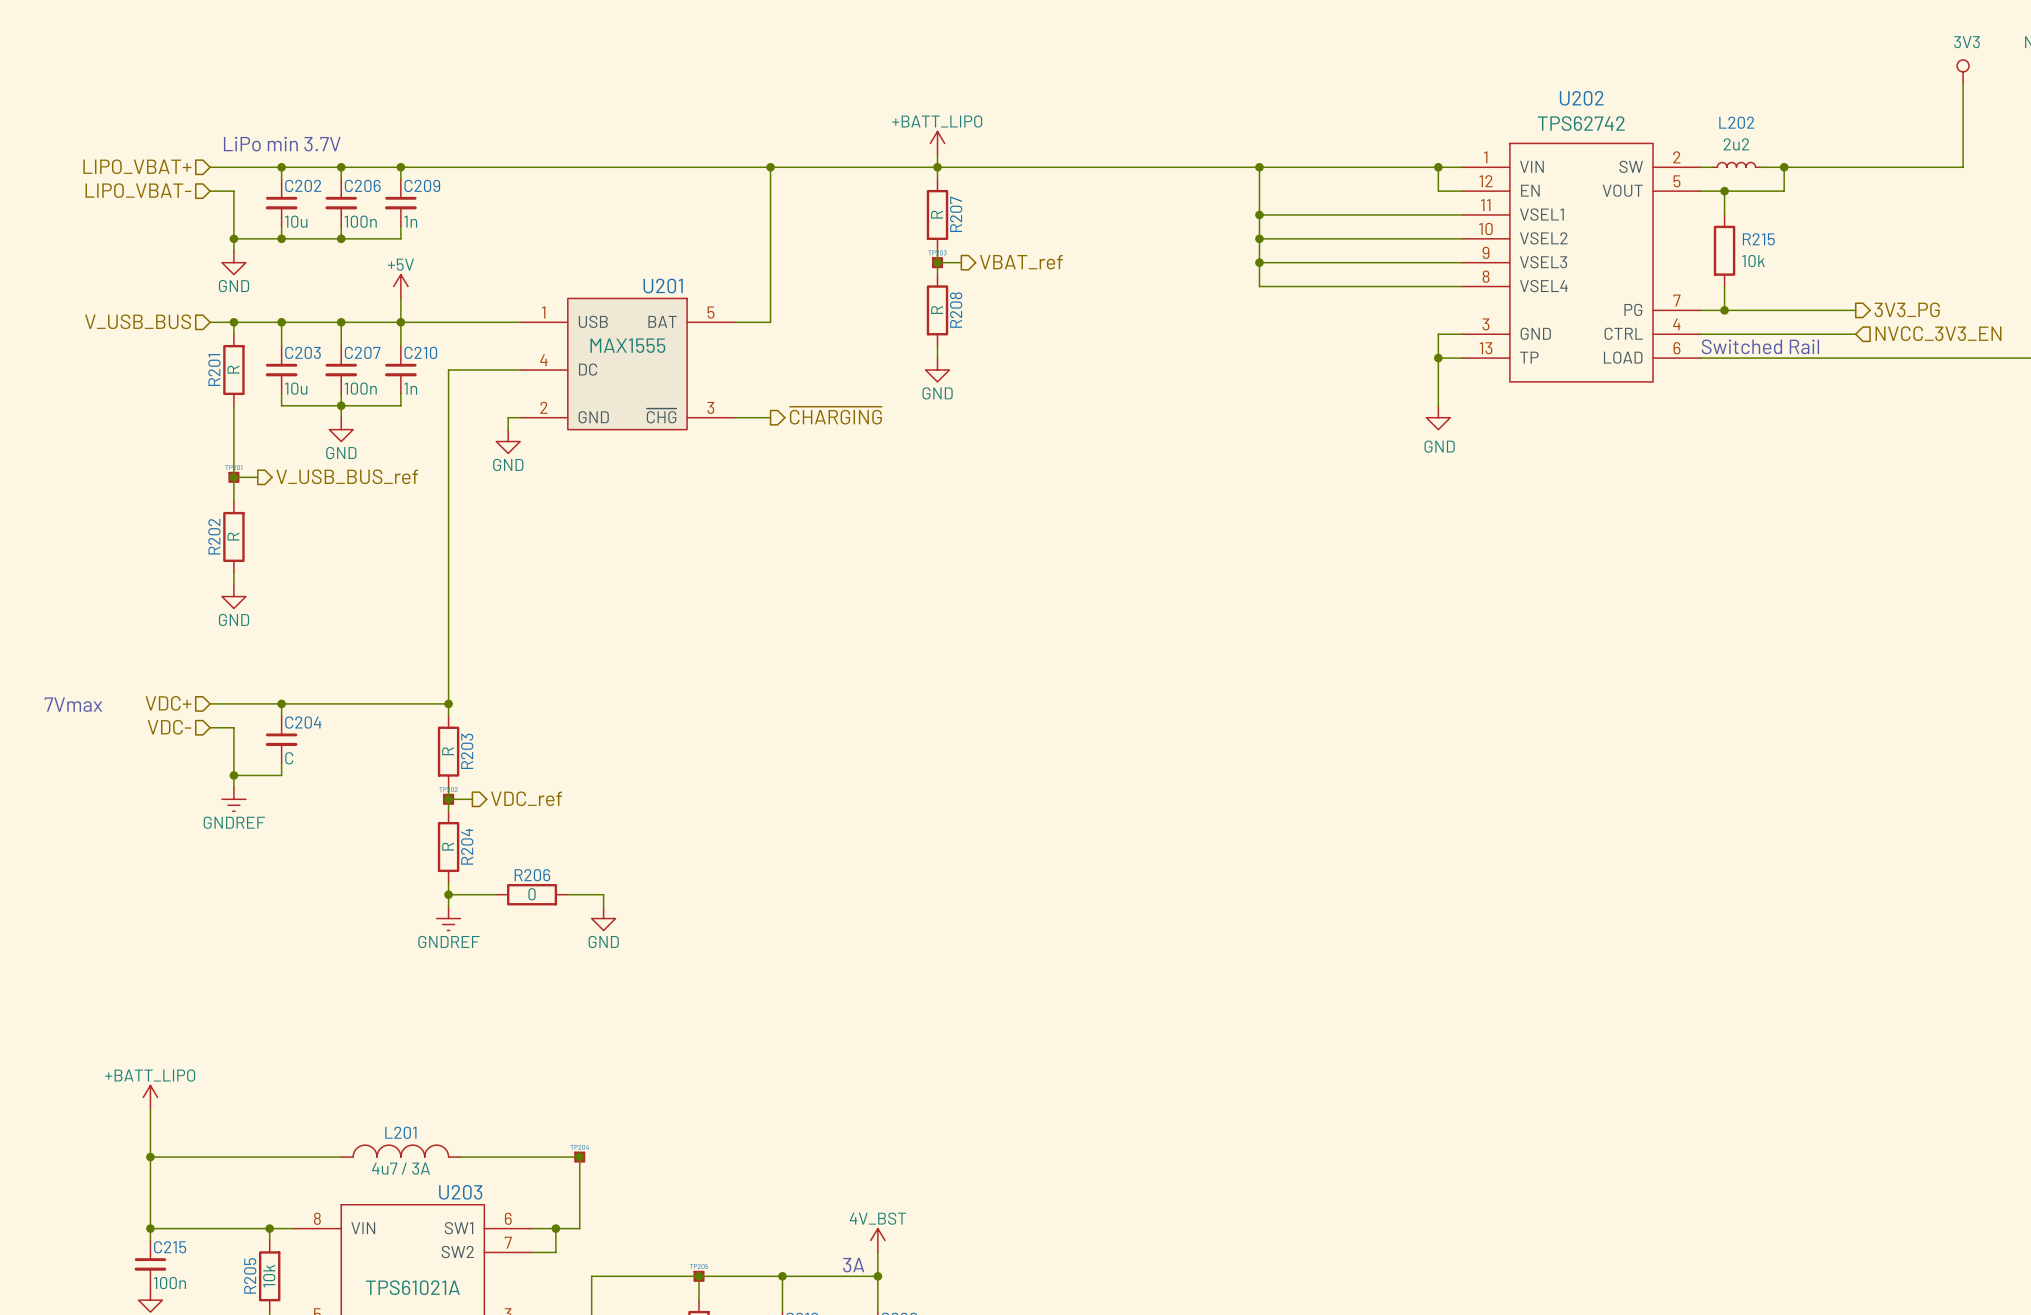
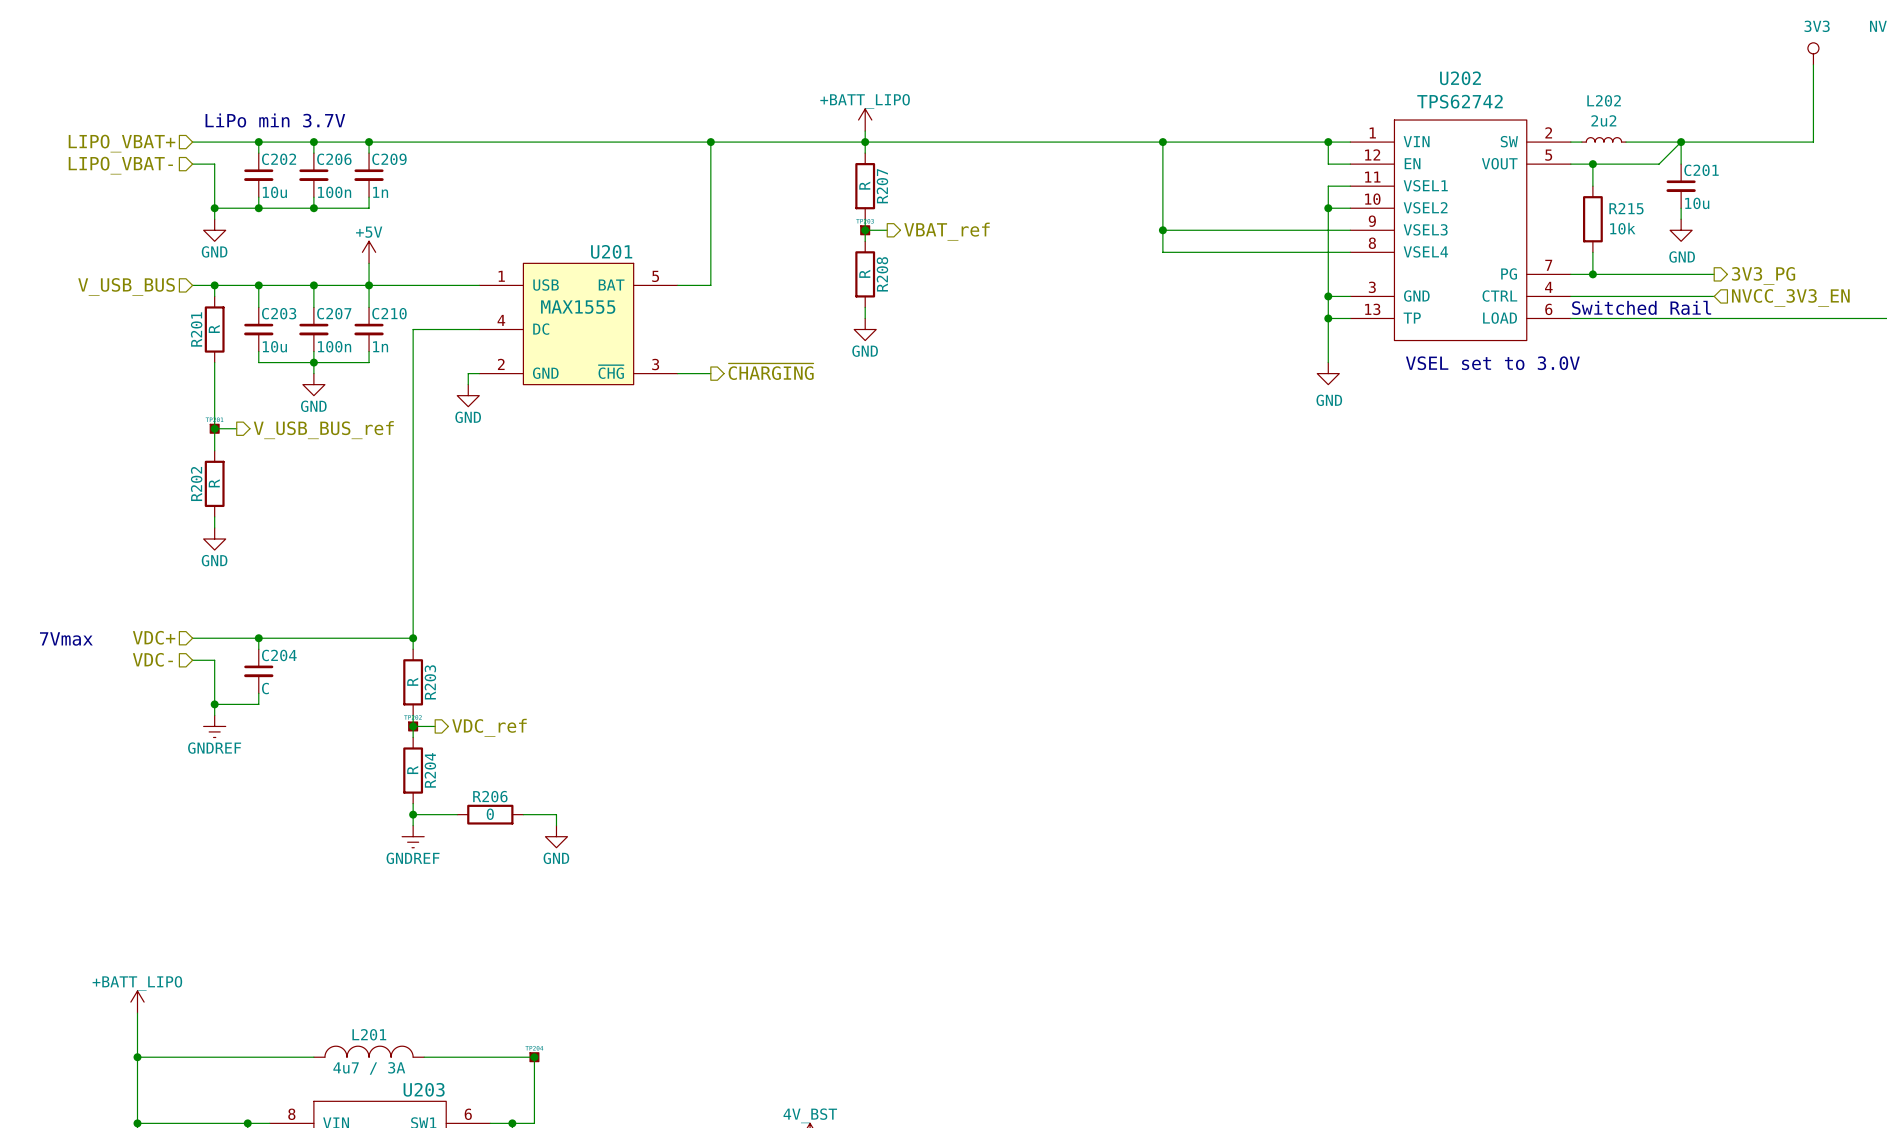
wire: (1784, 167) (1784, 191) -> (1681, 164) (1681, 142) (1659, 164) (1648, 164)
junction position: (1784, 167) -> (1681, 142)
wire: (1259, 214) (1438, 214) -> (1328, 296) (1328, 186)
junction: (1259, 214) -> none
C201: none -> 10u (1681, 186)
wire: (1259, 238) (1438, 238) -> none
junction: (1259, 238) -> none
junction: none -> (1328, 208)
wire: none -> (1681, 208) (1681, 219)
power symbol: none -> GND (1681, 230)
junction: none -> (1328, 296)
text: none -> VSEL set to 3.0V (1492, 363)

